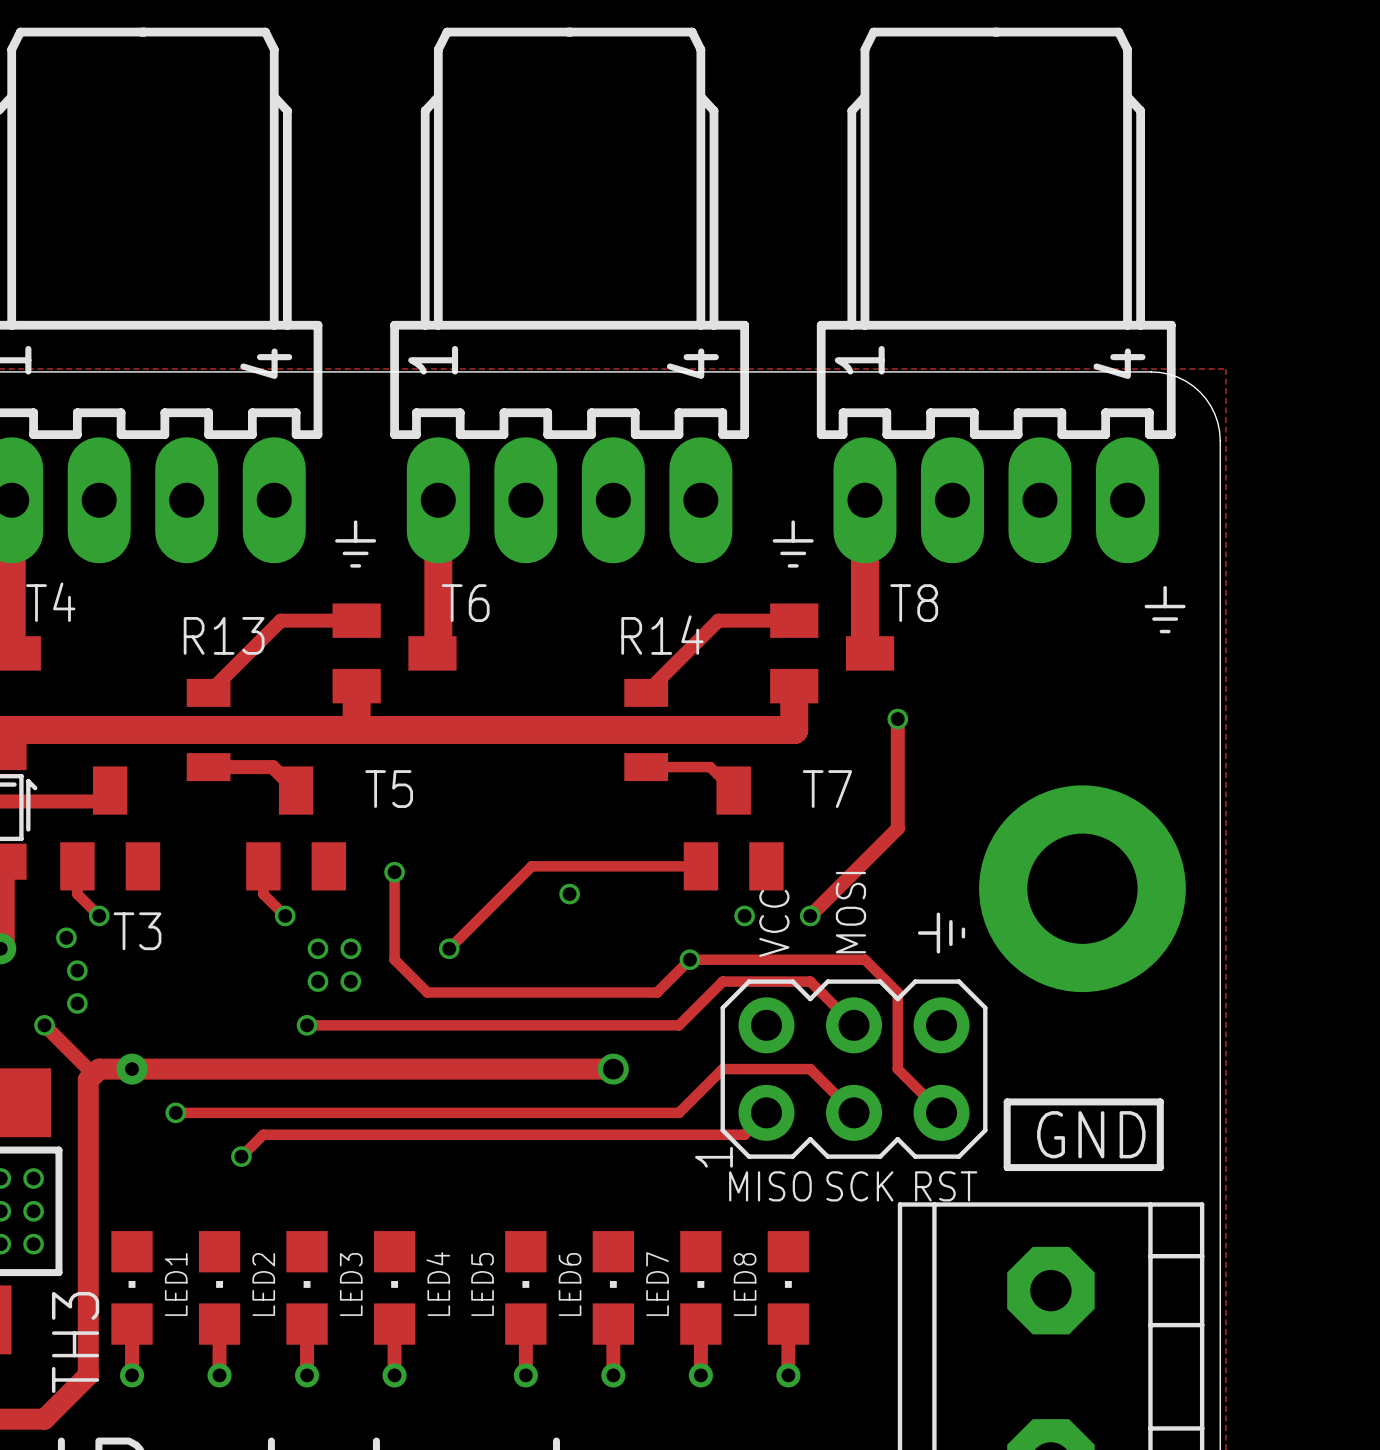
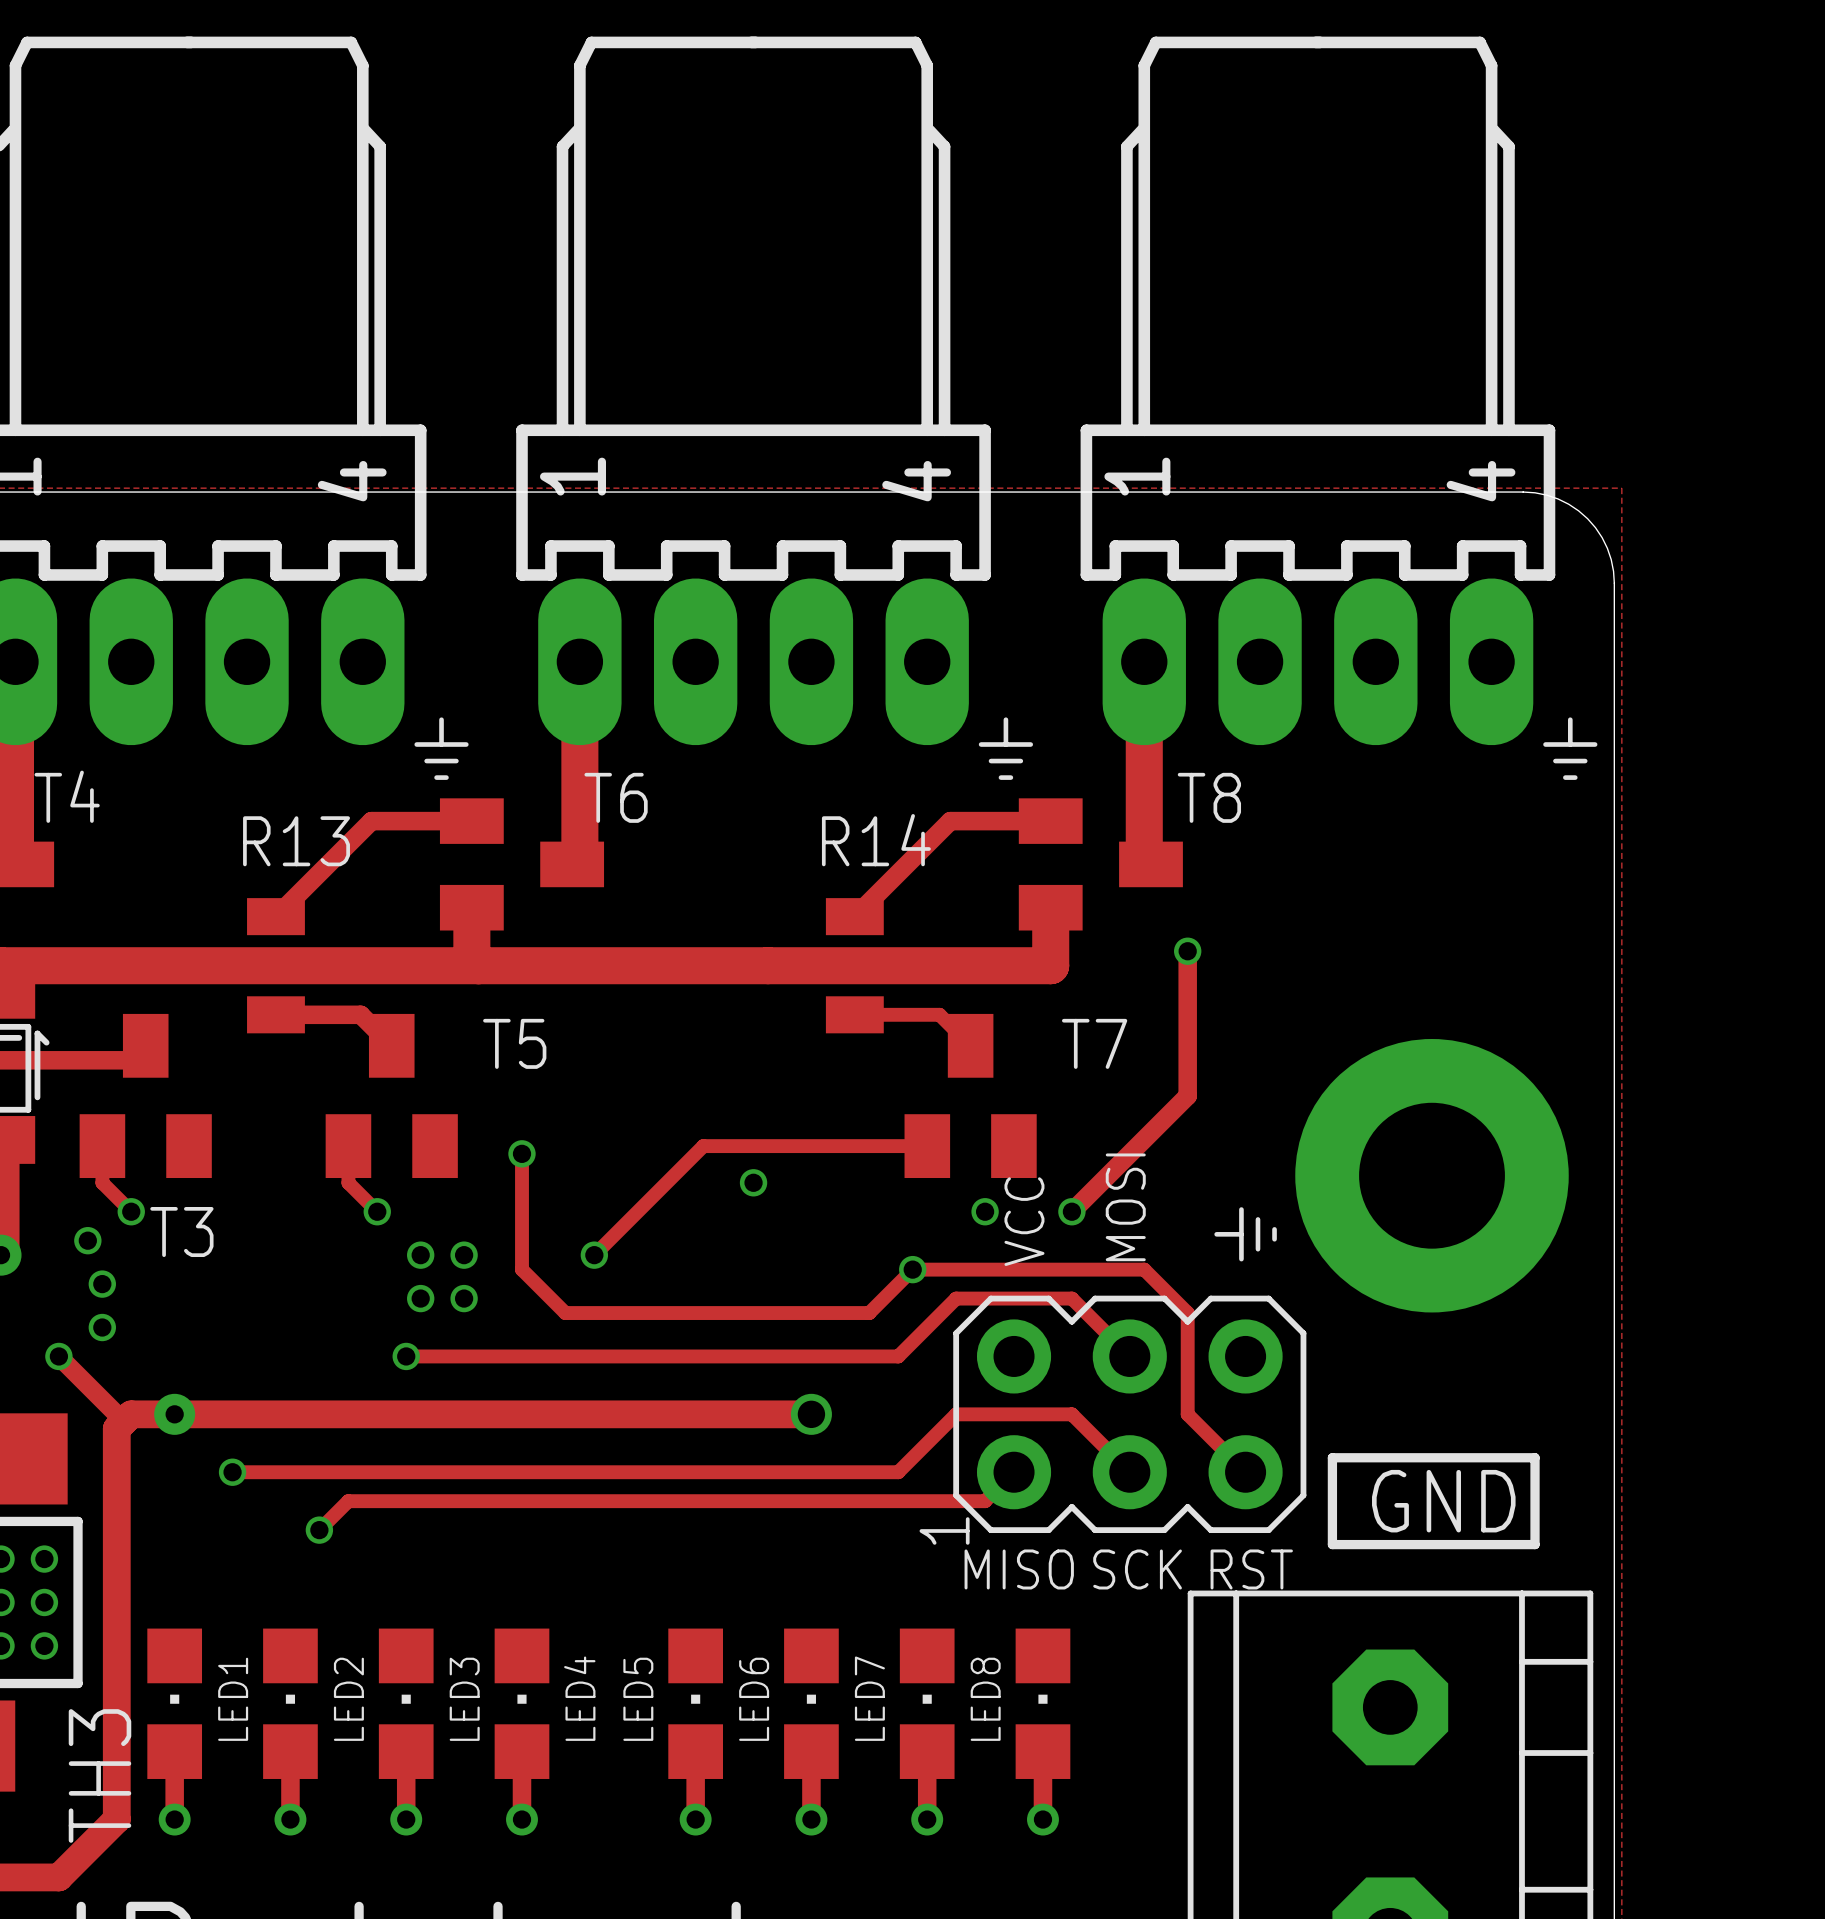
text position: ⏚ (355, 544) -> ⏚ (441, 748)
text position: ⏚ (793, 544) -> ⏚ (1005, 748)
text position: ⏚ (1165, 609) -> ⏚ (1570, 748)

